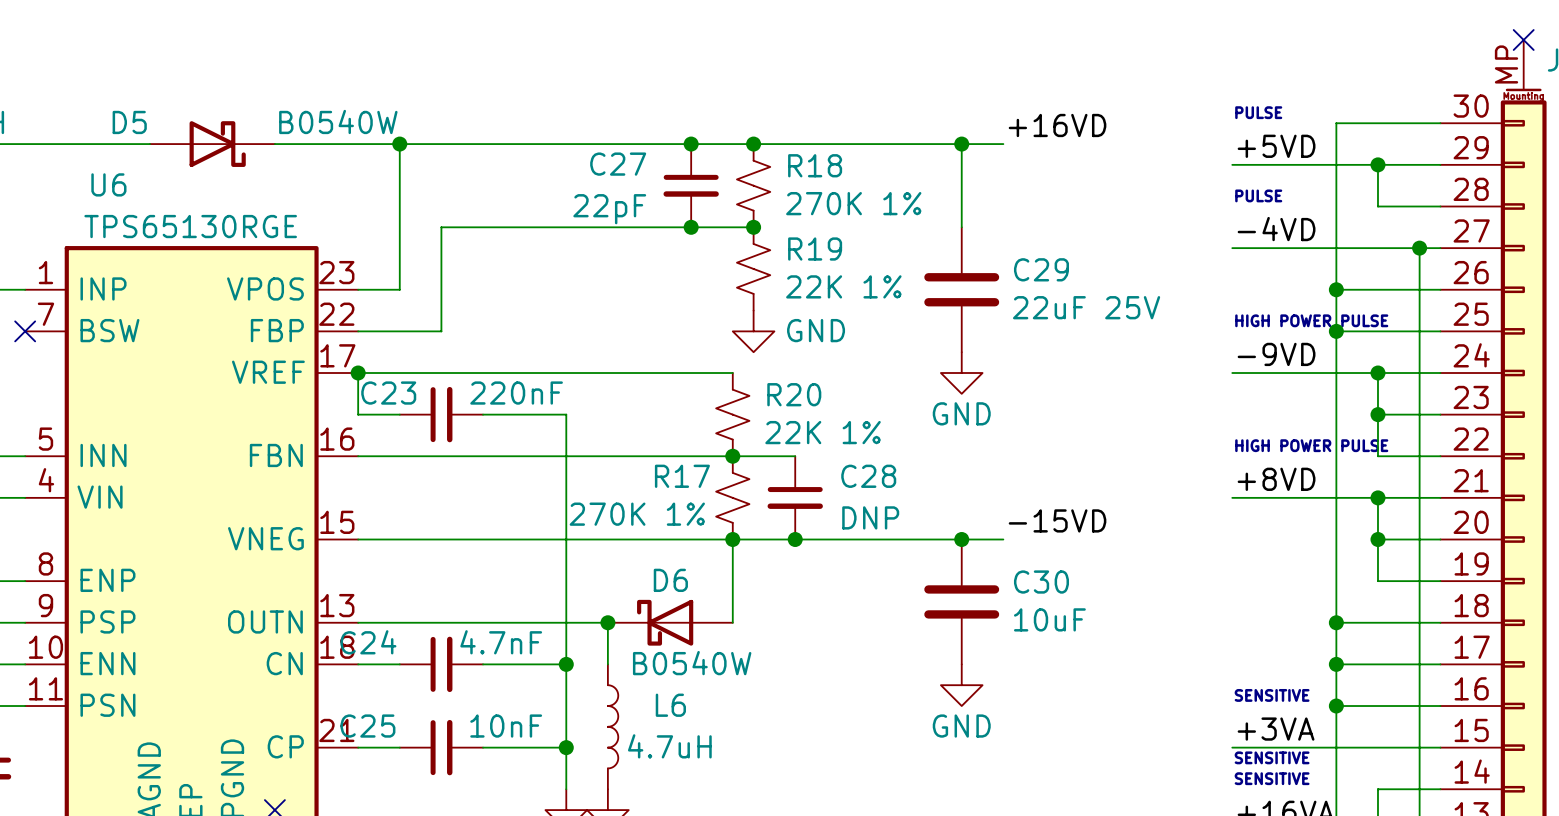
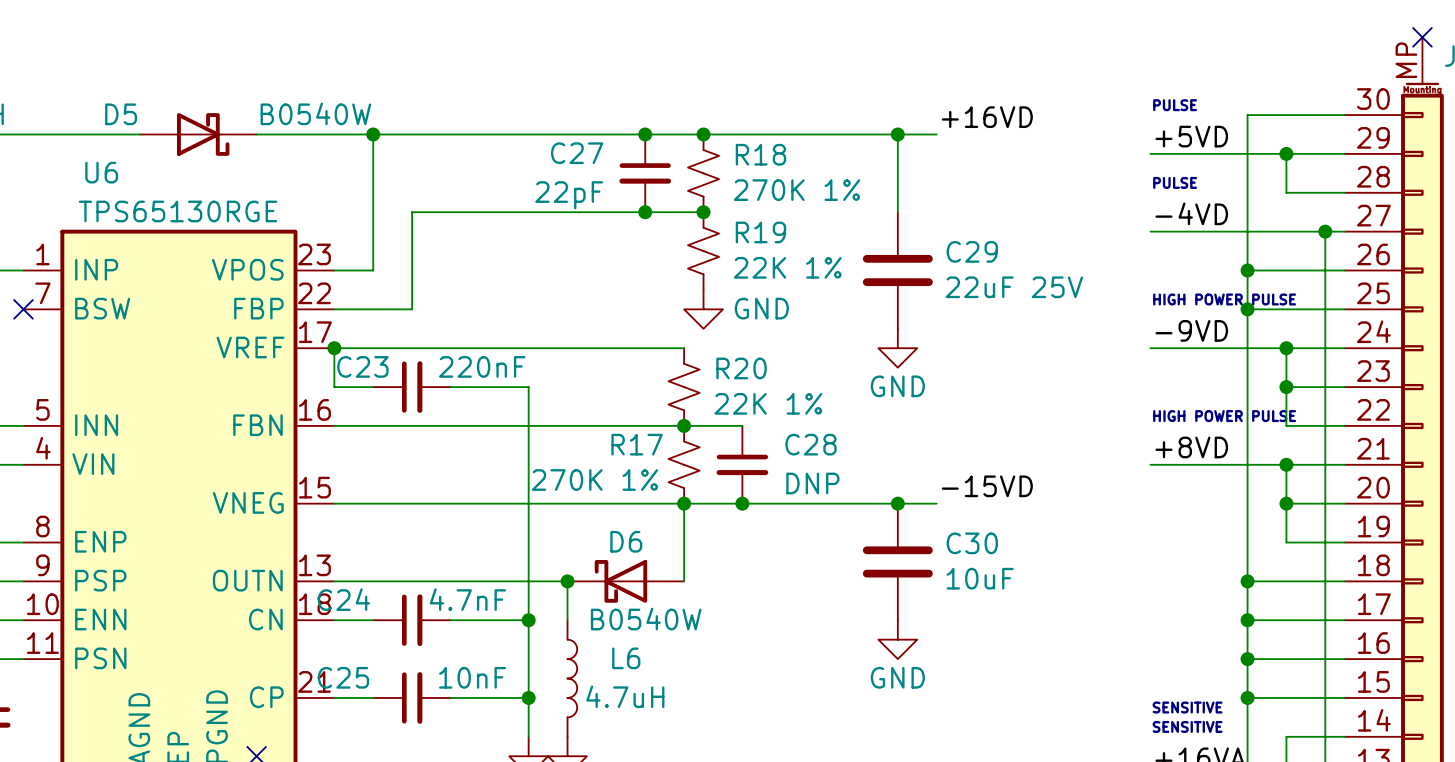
text: SENSITIVE (1272, 695) -> none
label: +3VA (1276, 729) -> none
wire: (1232, 747) (1336, 747) -> none
junction: none -> (1247, 697)

